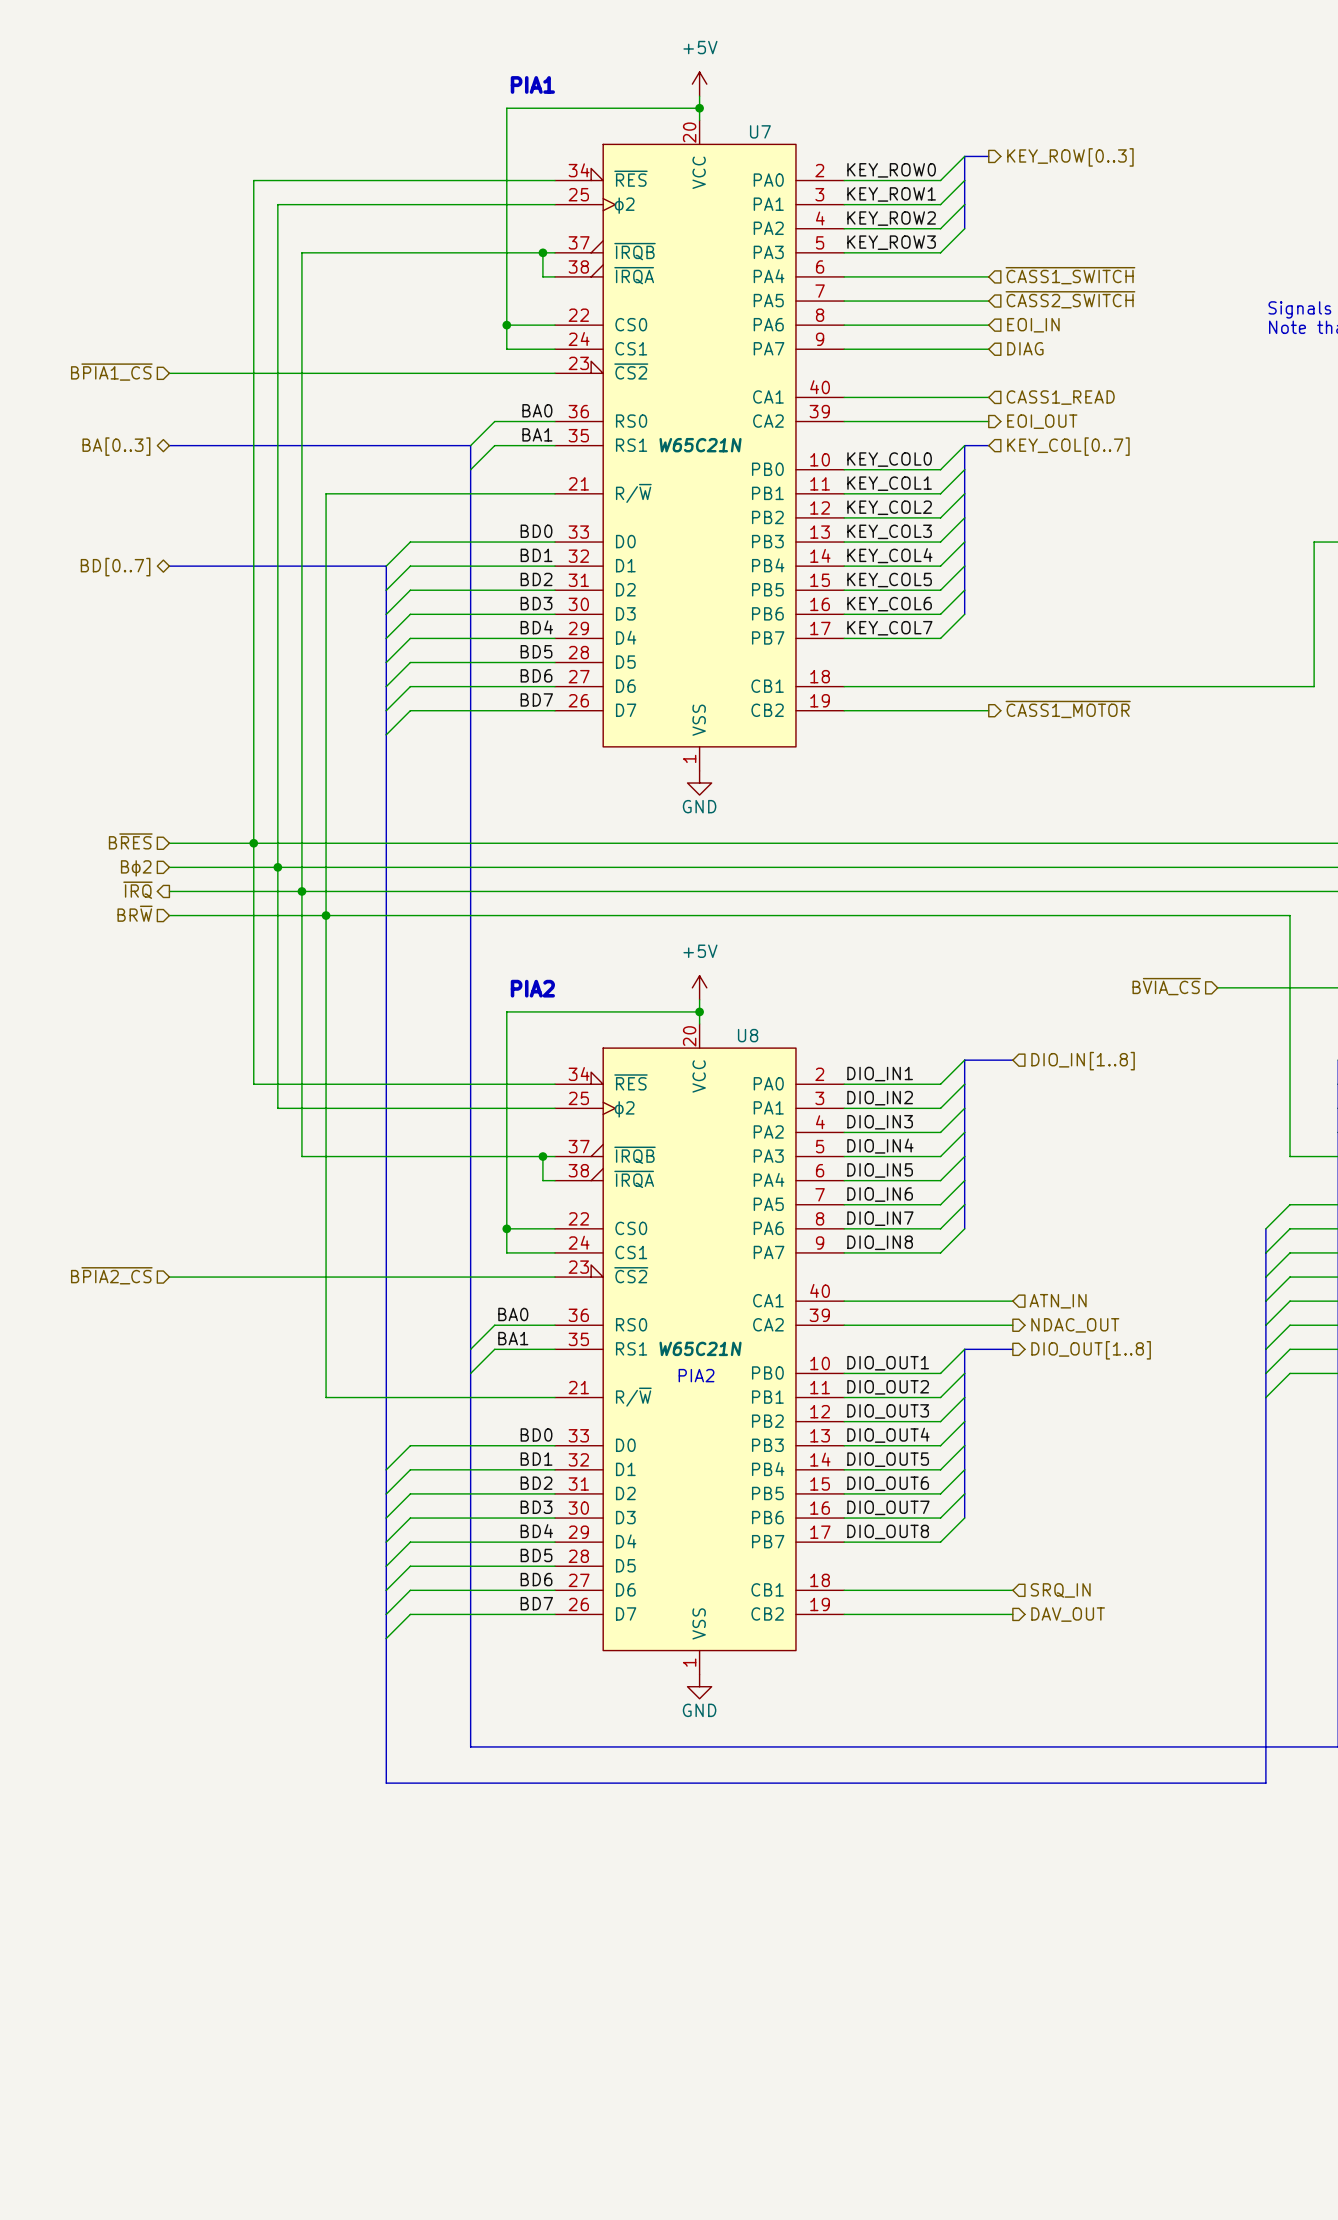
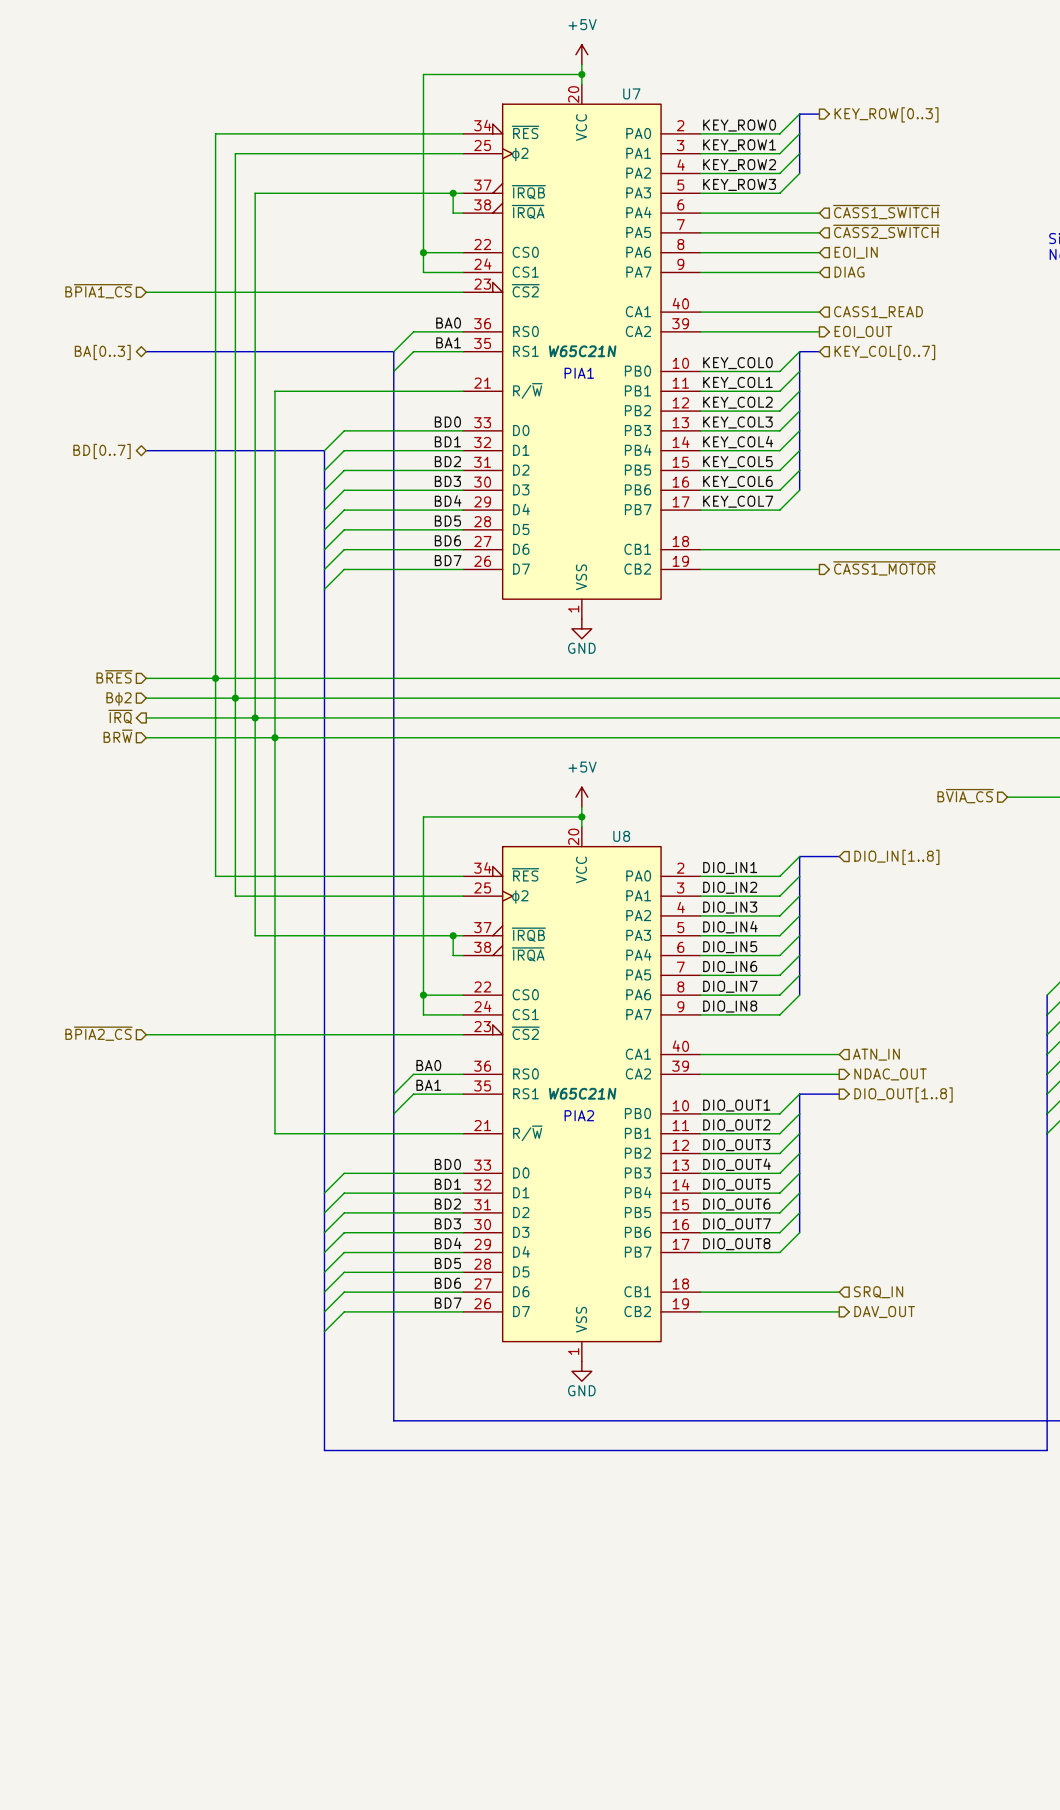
text: PIA1 (532, 84) -> none
text: none -> PIA1 (579, 373)
text: PIA2 (532, 988) -> none

